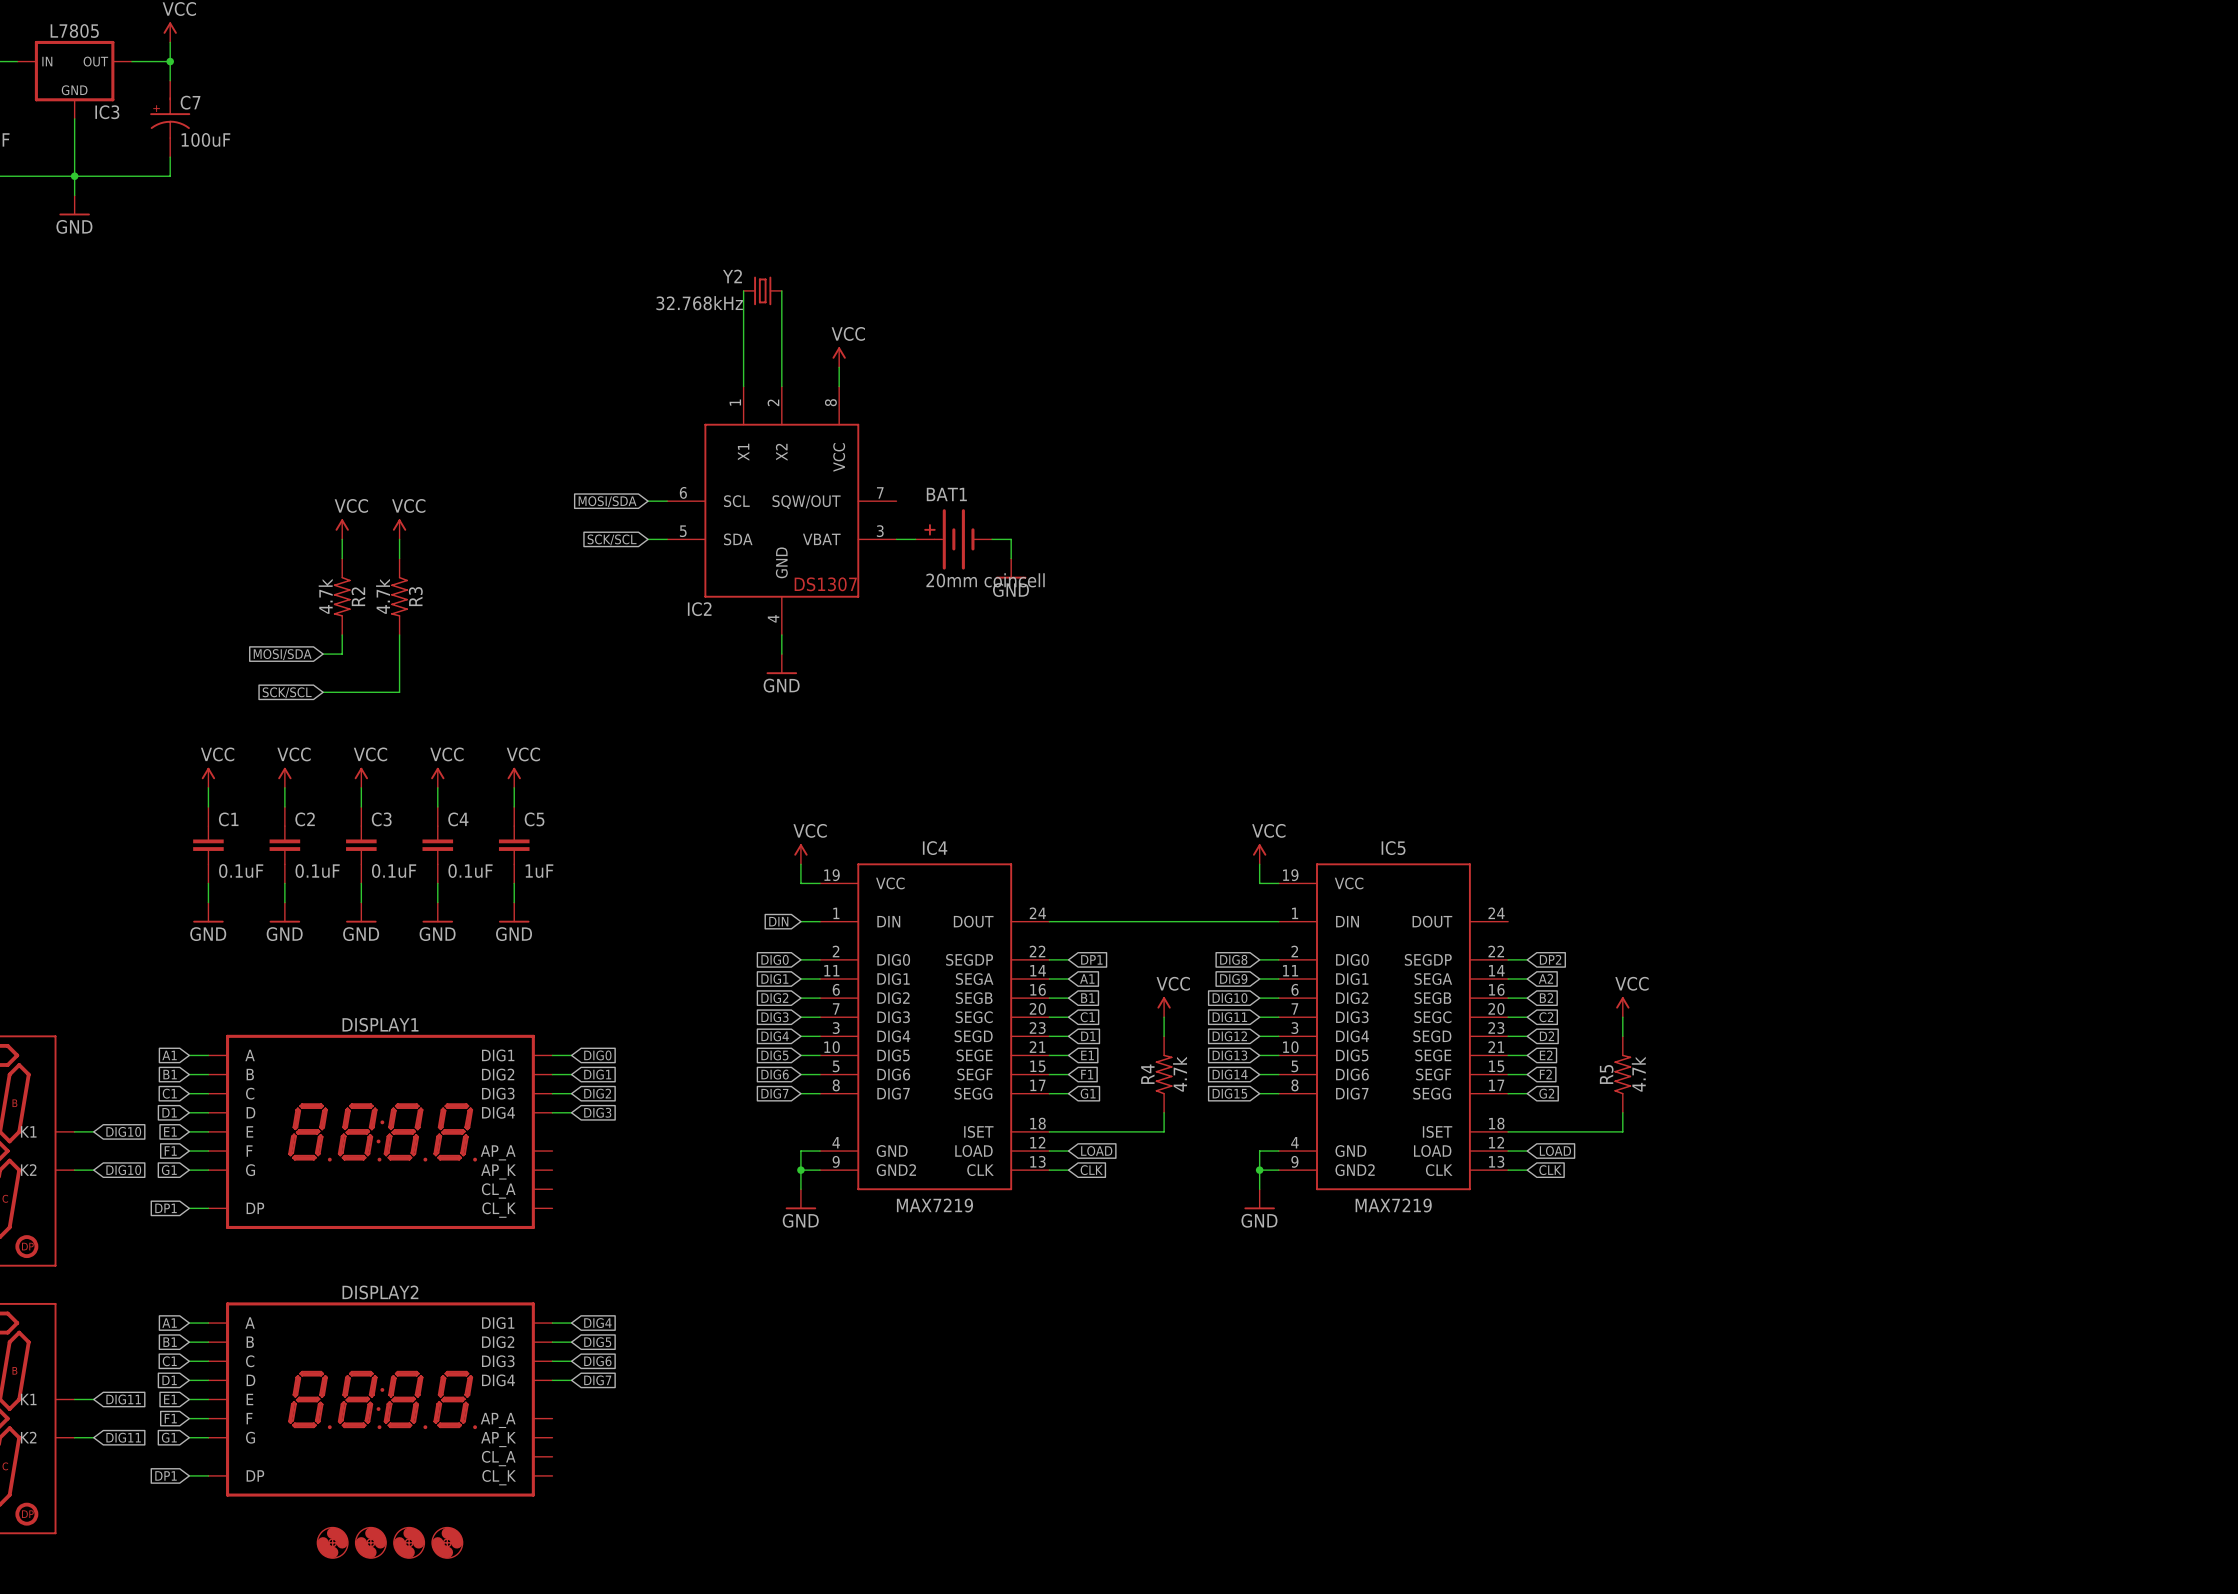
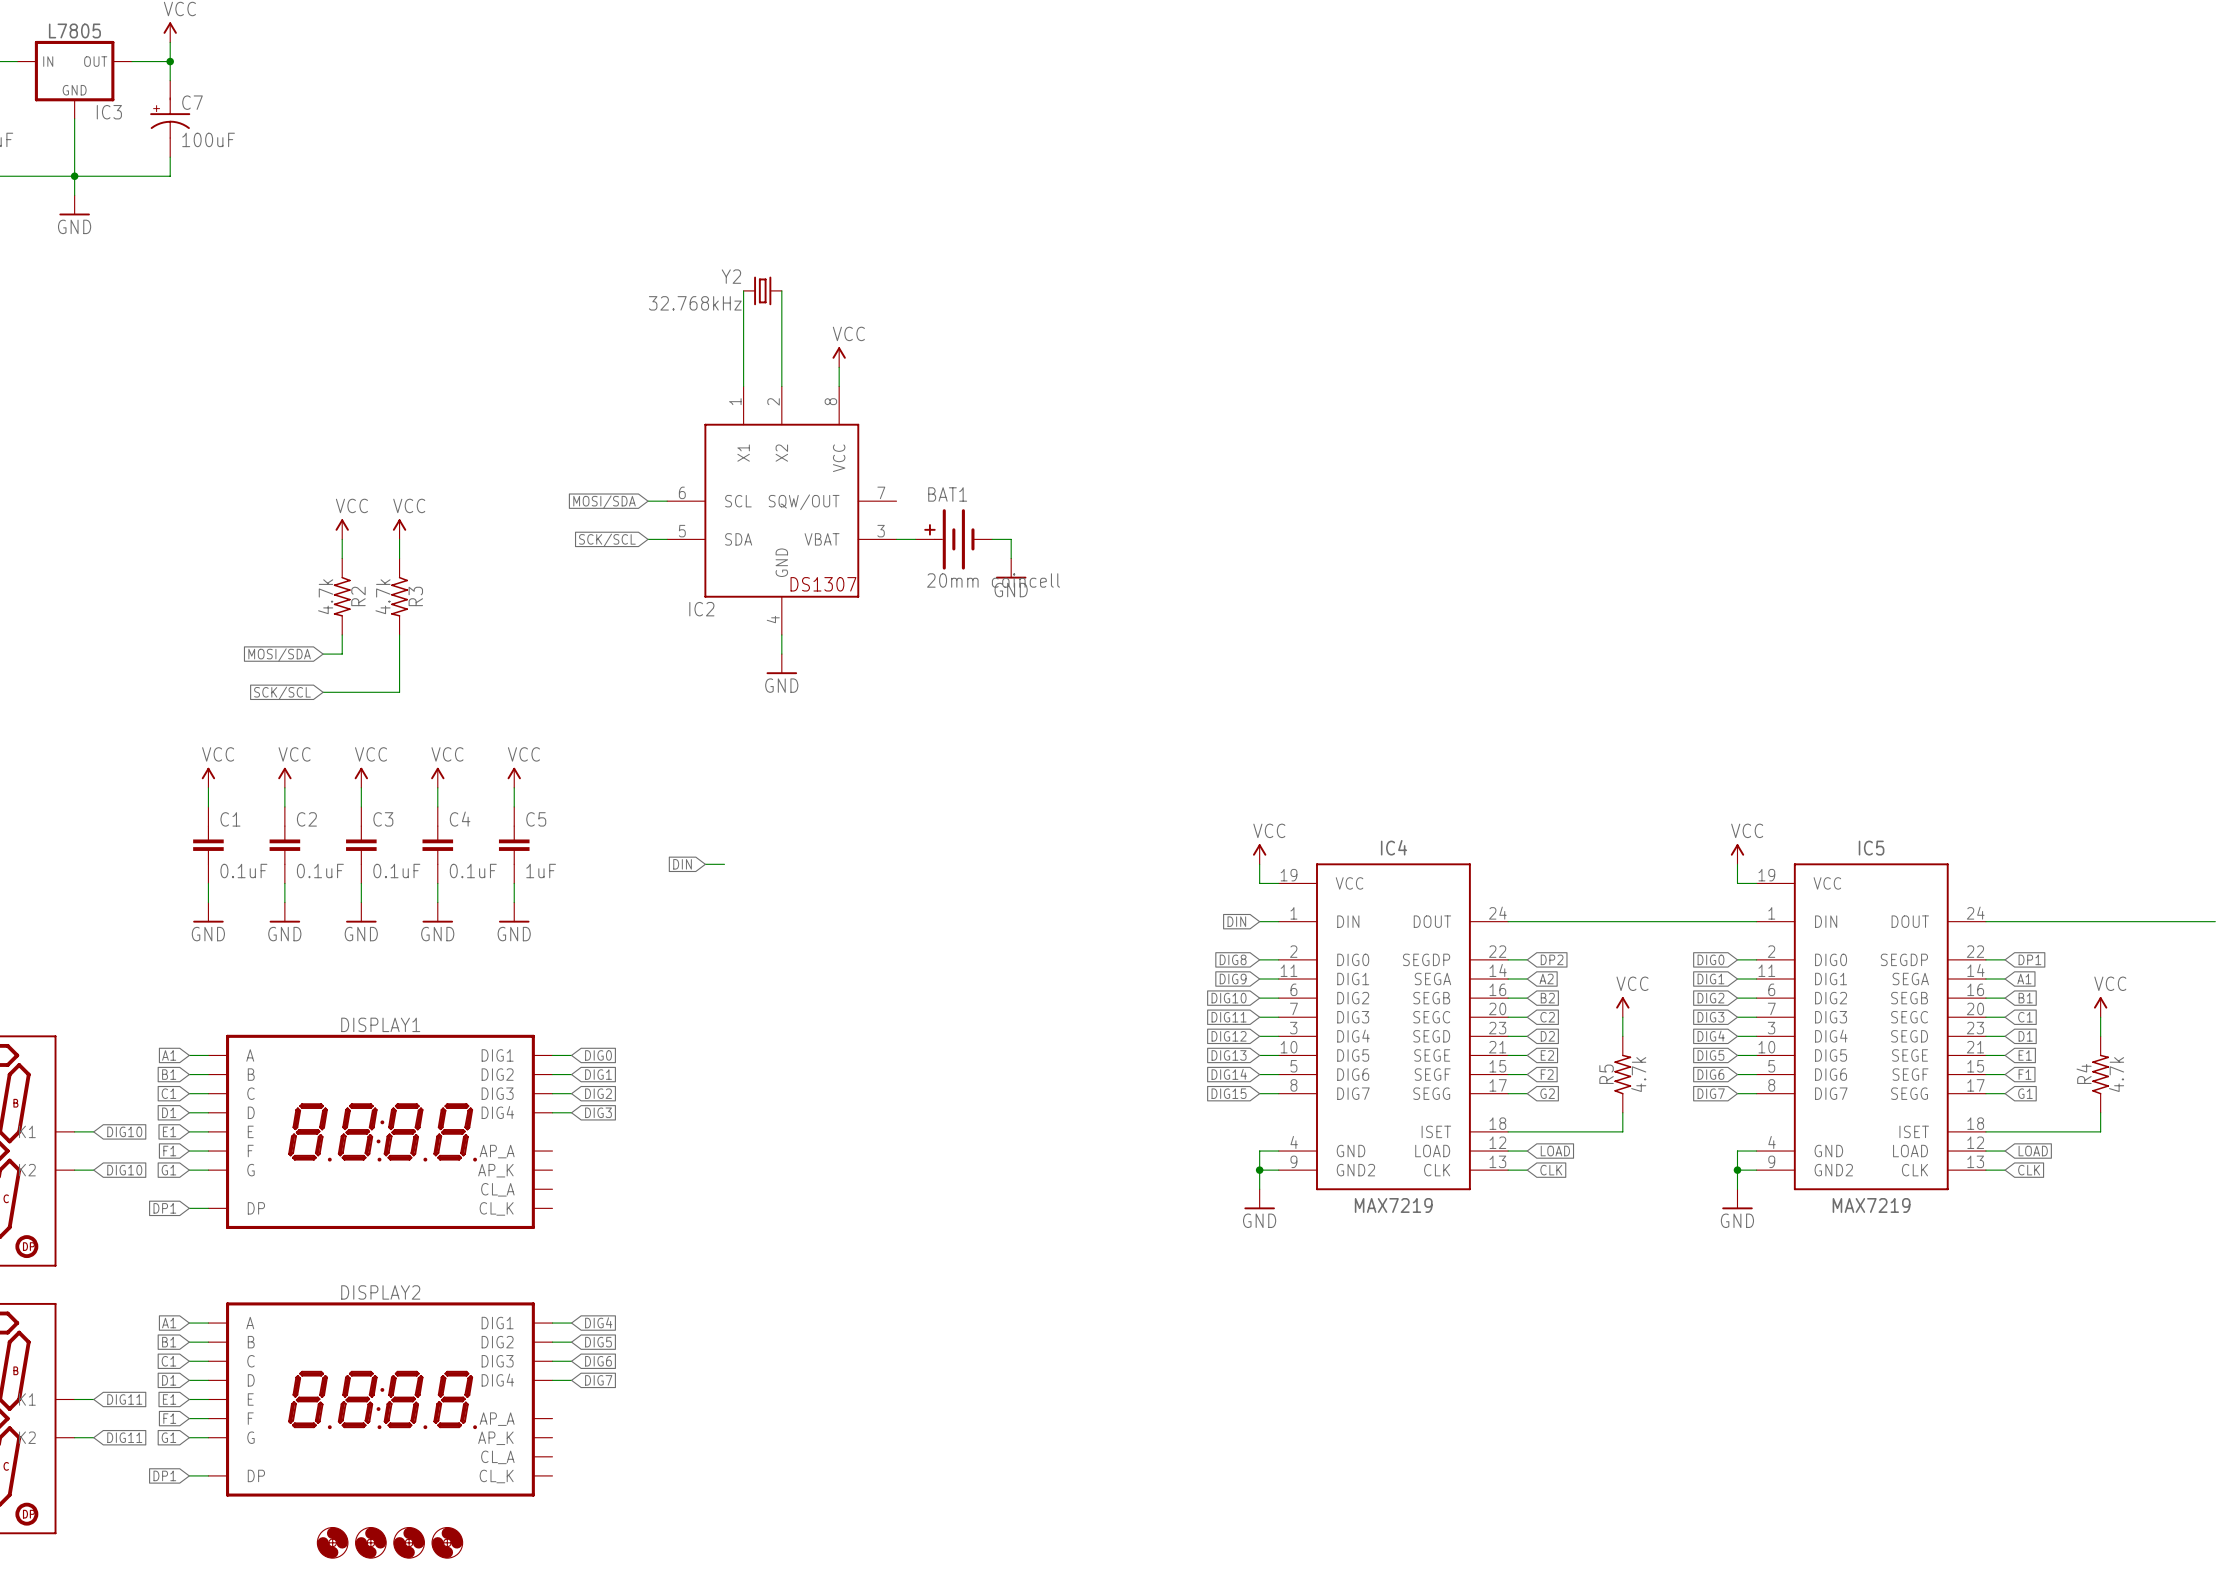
IC5 name: IC5 (1393, 848) -> IC4 (1394, 847)
power symbol: VCC (800, 854) -> none
power symbol: none -> VCC (1737, 854)
wire: (800, 864) (800, 883) (820, 883) -> none
wire: none -> (1737, 864) (1737, 883) (1756, 883)
global label position: DIN (778, 921) -> DIN (682, 864)
wire: (800, 921) (820, 921) -> (705, 864) (724, 864)
wire: (1049, 921) (1259, 921) -> none
global label: none -> DIN (1236, 921)
wire: none -> (1508, 921) (1756, 921)
wire: none -> (1985, 921) (2215, 921)
global label: DIG0 (775, 959) -> none
wire: (800, 959) (820, 959) -> none
wire: (1049, 959) (1068, 959) -> none
global label: DP1 (1091, 959) -> none
global label: none -> DIG0 (1710, 959)
wire: none -> (1737, 959) (1756, 959)
wire: none -> (1985, 959) (2005, 959)
global label: none -> DP1 (2029, 959)
global label: DIG1 (774, 979) -> none
wire: (800, 979) (820, 979) -> none
wire: (1049, 979) (1068, 979) -> none
global label: A1 (1087, 979) -> none
global label: none -> DIG1 (1710, 979)
wire: none -> (1737, 979) (1756, 979)
wire: none -> (1985, 979) (2005, 979)
global label: none -> A1 (2024, 979)
global label: DIG2 (774, 998) -> none
wire: (800, 998) (820, 998) -> none
wire: (1049, 998) (1068, 998) -> none
global label: B1 (1087, 998) -> none
global label: none -> DIG2 (1710, 998)
wire: none -> (1737, 998) (1756, 998)
wire: none -> (1985, 998) (2005, 998)
global label: none -> B1 (2025, 998)
power symbol: VCC (1164, 1007) -> none
power symbol: none -> VCC (2100, 1007)
global label: DIG3 (774, 1017) -> none
wire: (800, 1017) (820, 1017) -> none
wire: (1049, 1017) (1068, 1017) -> none
global label: C1 (1087, 1017) -> none
wire: (1164, 1017) (1164, 1036) -> none
global label: none -> DIG3 (1710, 1017)
wire: none -> (1737, 1017) (1756, 1017)
wire: none -> (1985, 1017) (2005, 1017)
global label: none -> C1 (2025, 1017)
wire: none -> (2100, 1017) (2100, 1036)
IC4: MAX7219 (934, 1026) -> none
IC5: none -> MAX7219 (1871, 1026)
global label: DIG4 (775, 1036) -> none
wire: (800, 1036) (820, 1036) -> none
wire: (1049, 1036) (1068, 1036) -> none
global label: D1 (1088, 1036) -> none
global label: none -> DIG4 (1711, 1036)
wire: none -> (1737, 1036) (1756, 1036)
wire: none -> (1985, 1036) (2005, 1036)
global label: none -> D1 (2025, 1036)
global label: DIG5 (774, 1055) -> none
wire: (800, 1055) (820, 1055) -> none
wire: (1049, 1055) (1068, 1055) -> none
global label: E1 (1087, 1055) -> none
global label: none -> DIG5 (1710, 1055)
wire: none -> (1737, 1055) (1756, 1055)
wire: none -> (1985, 1055) (2005, 1055)
global label: none -> E1 (2025, 1055)
global label: DIG6 (775, 1074) -> none
wire: (800, 1074) (820, 1074) -> none
wire: (1049, 1074) (1068, 1074) -> none
global label: F1 (1087, 1074) -> none
R4 position: (1164, 1074) -> (2100, 1074)
global label: none -> DIG6 (1710, 1074)
wire: none -> (1737, 1074) (1756, 1074)
wire: none -> (1985, 1074) (2005, 1074)
global label: none -> F1 (2025, 1074)
global label: DIG7 (774, 1093) -> none
wire: (800, 1093) (820, 1093) -> none
wire: (1049, 1093) (1068, 1093) -> none
global label: G1 (1088, 1093) -> none
global label: none -> DIG7 (1711, 1093)
wire: none -> (1737, 1093) (1756, 1093)
wire: none -> (1985, 1093) (2005, 1093)
global label: none -> G1 (2025, 1093)
wire: (1164, 1112) (1164, 1131) (1049, 1131) -> none
wire: none -> (2100, 1112) (2100, 1131) (1985, 1131)
wire: (820, 1151) (800, 1151) (800, 1189) -> none
wire: (1049, 1151) (1068, 1151) -> none
global label: LOAD (1096, 1151) -> none
wire: none -> (1756, 1151) (1737, 1151) (1737, 1189)
wire: none -> (1985, 1151) (2005, 1151)
global label: none -> LOAD (2033, 1151)
wire: (800, 1170) (820, 1170) -> none
junction: (800, 1170) -> none
wire: (1049, 1170) (1068, 1170) -> none
global label: CLK (1091, 1170) -> none
wire: none -> (1737, 1170) (1756, 1170)
junction: none -> (1737, 1170)
wire: none -> (1985, 1170) (2005, 1170)
global label: none -> CLK (2029, 1170)
power symbol: GND (800, 1199) -> none
power symbol: none -> GND (1737, 1199)

